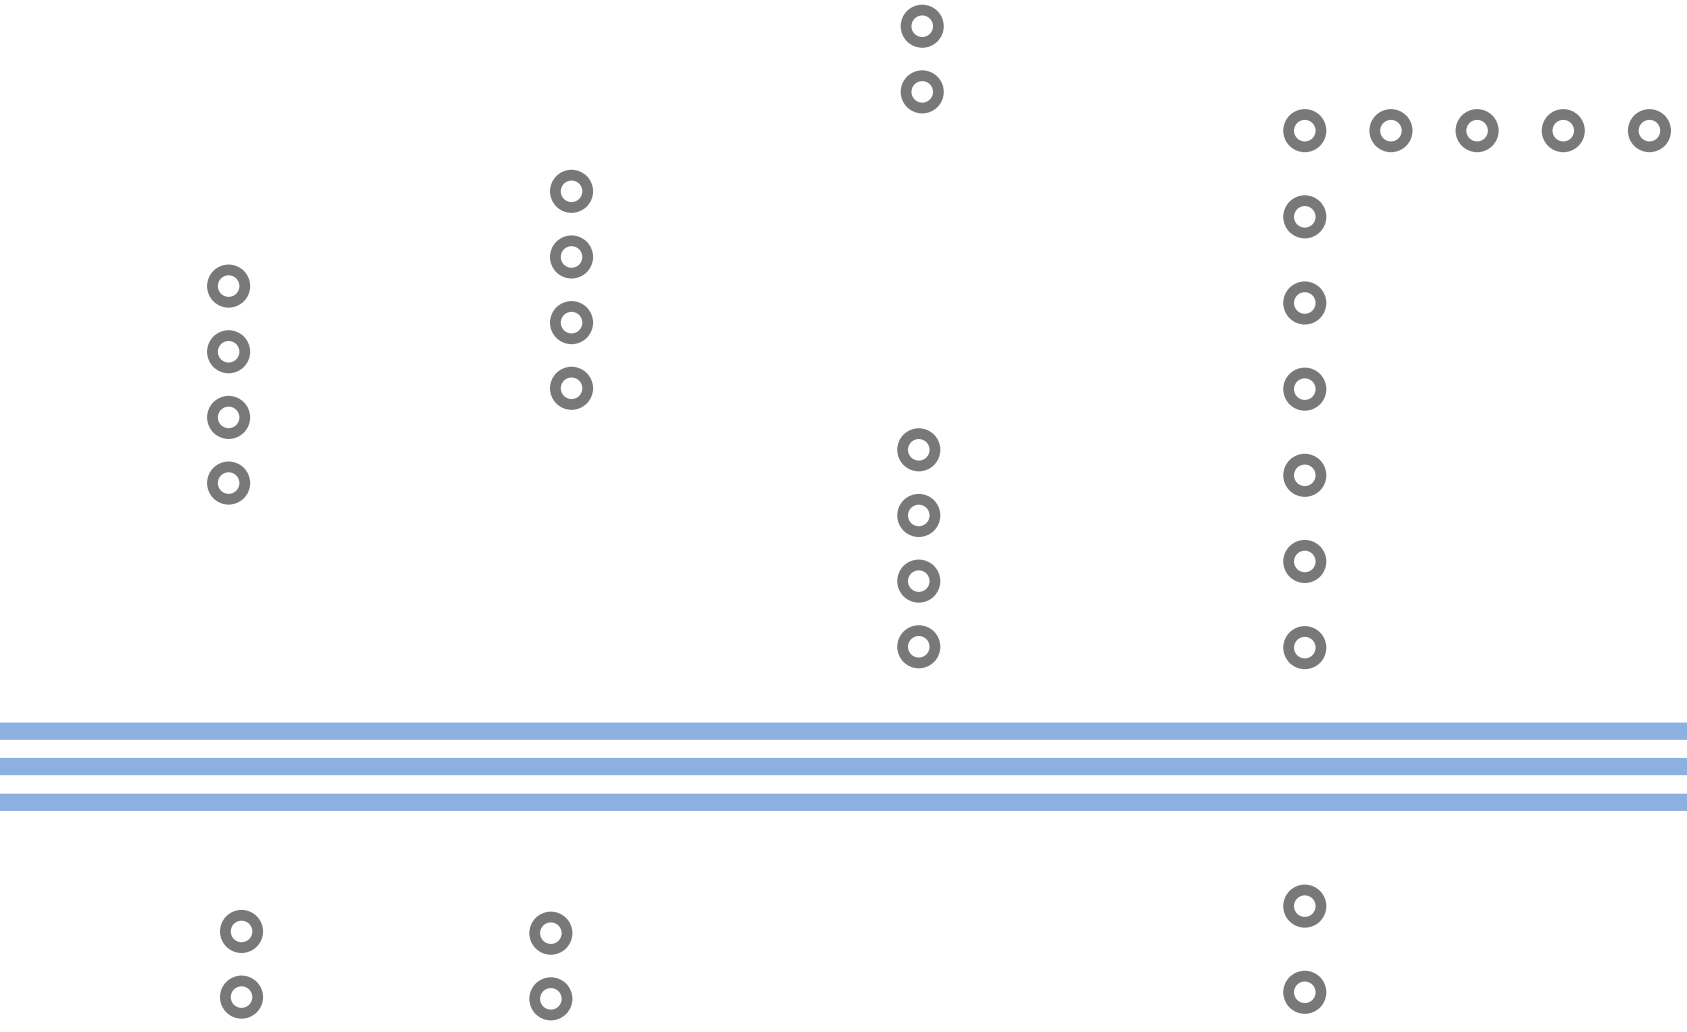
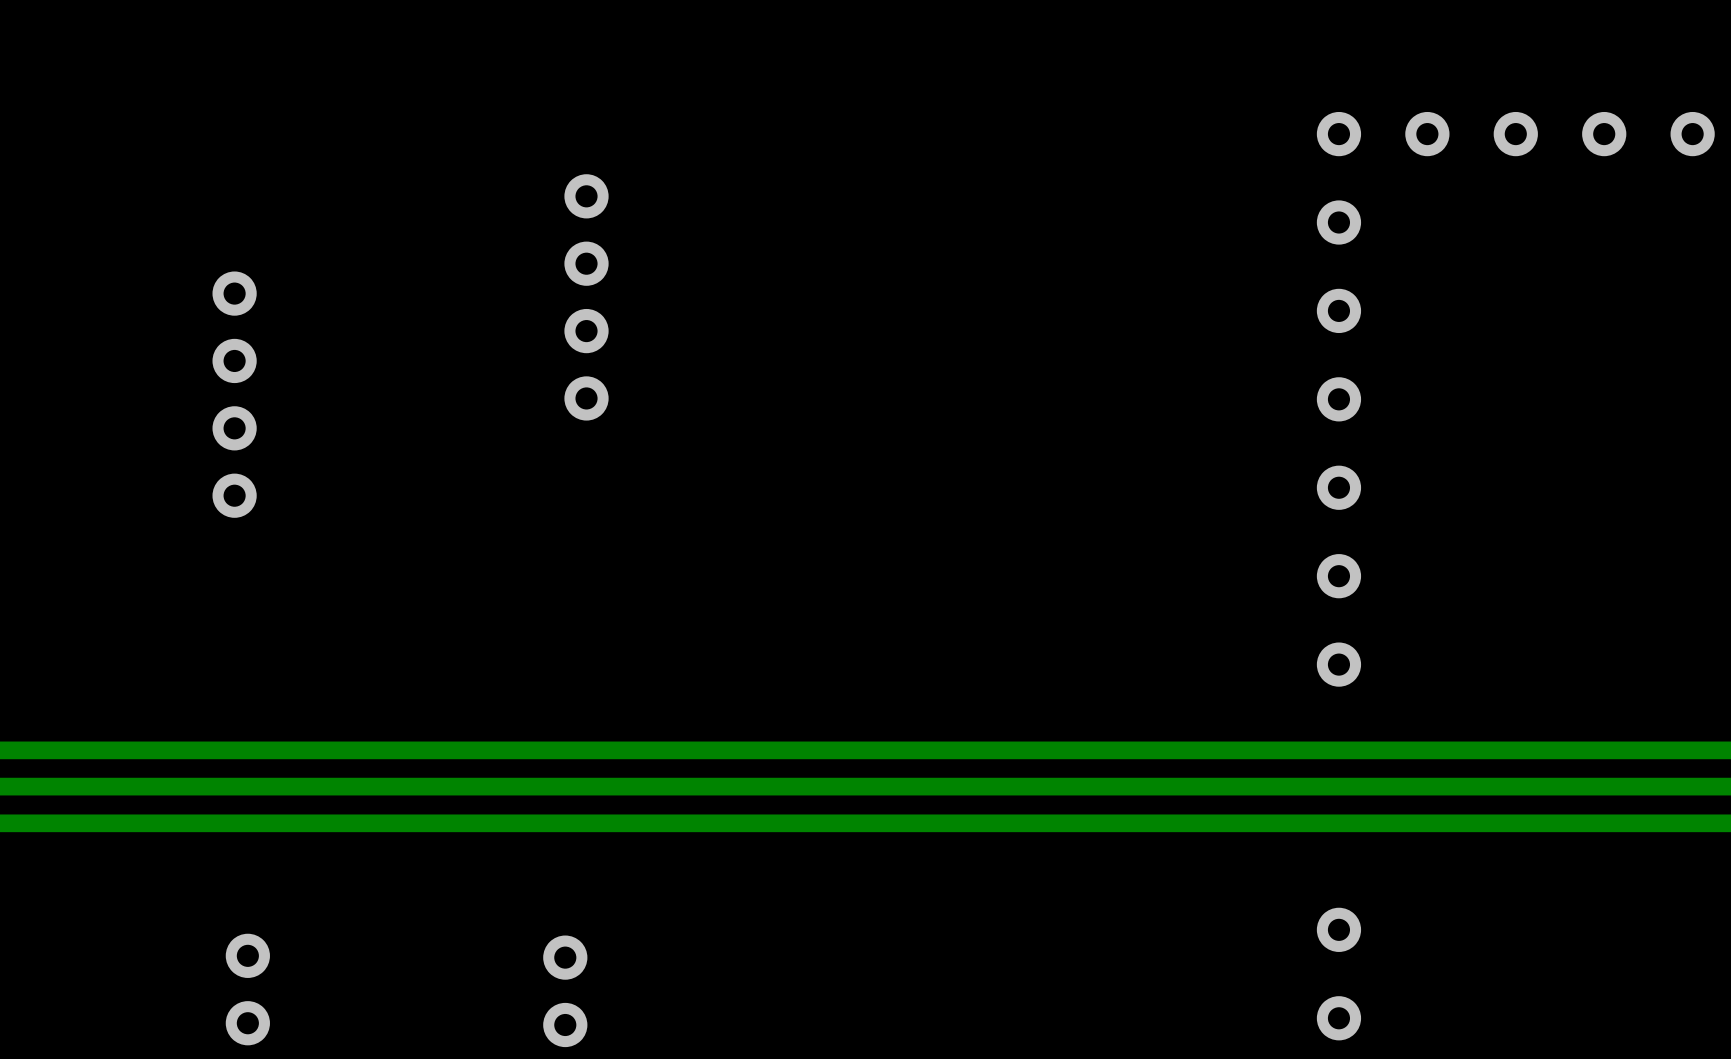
via: (922, 26) -> none
via: (922, 91) -> none
via: (918, 449) -> none
via: (918, 515) -> none
via: (918, 581) -> none
via: (918, 646) -> none

